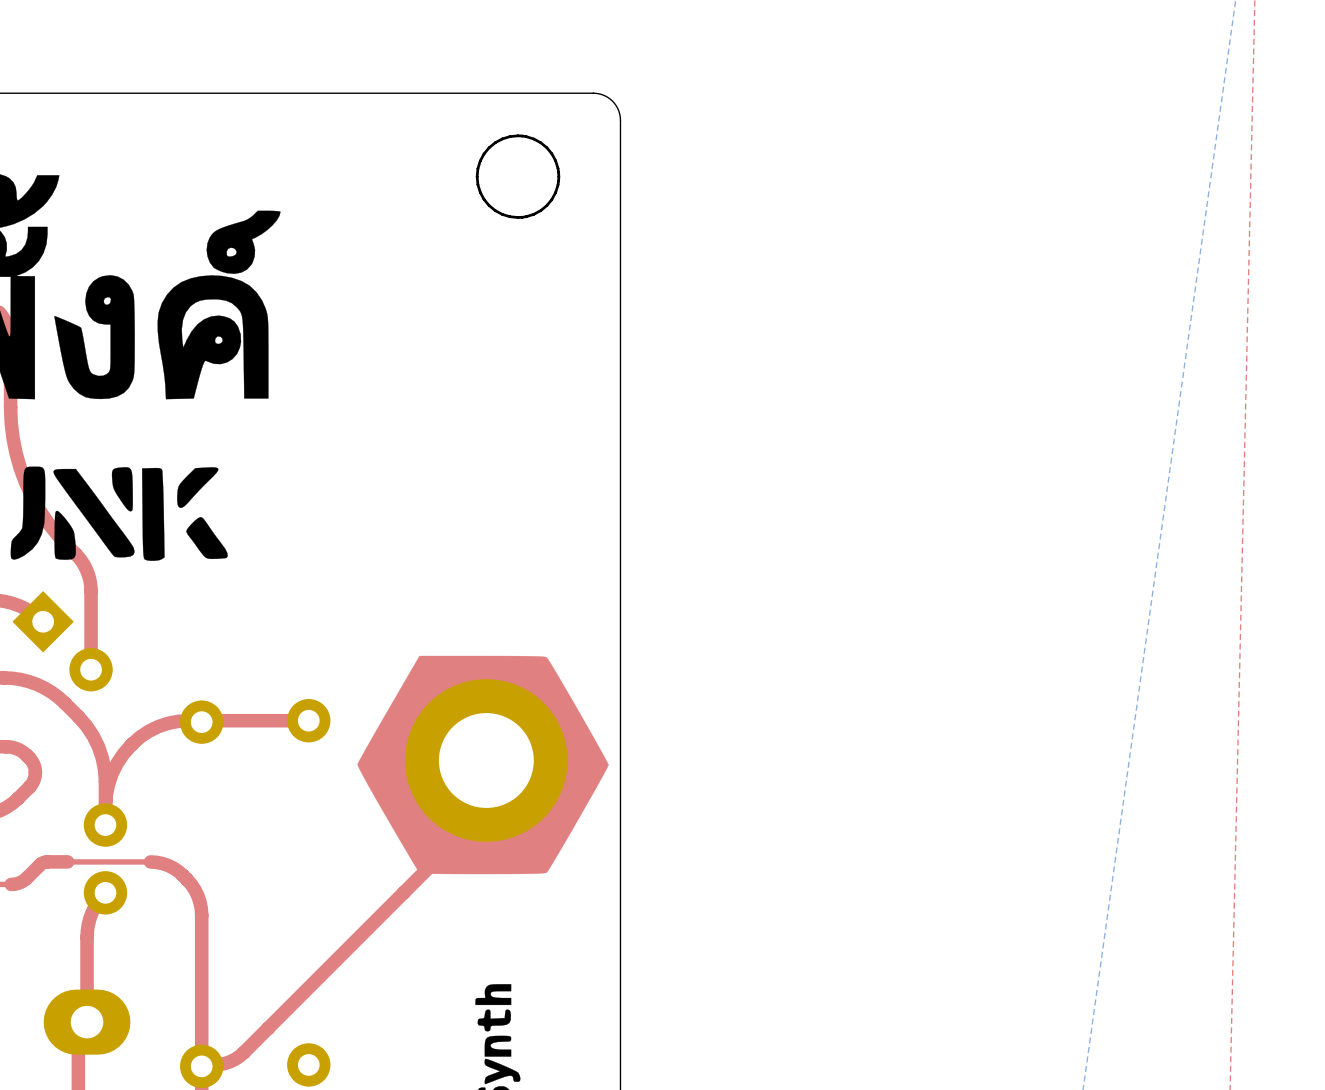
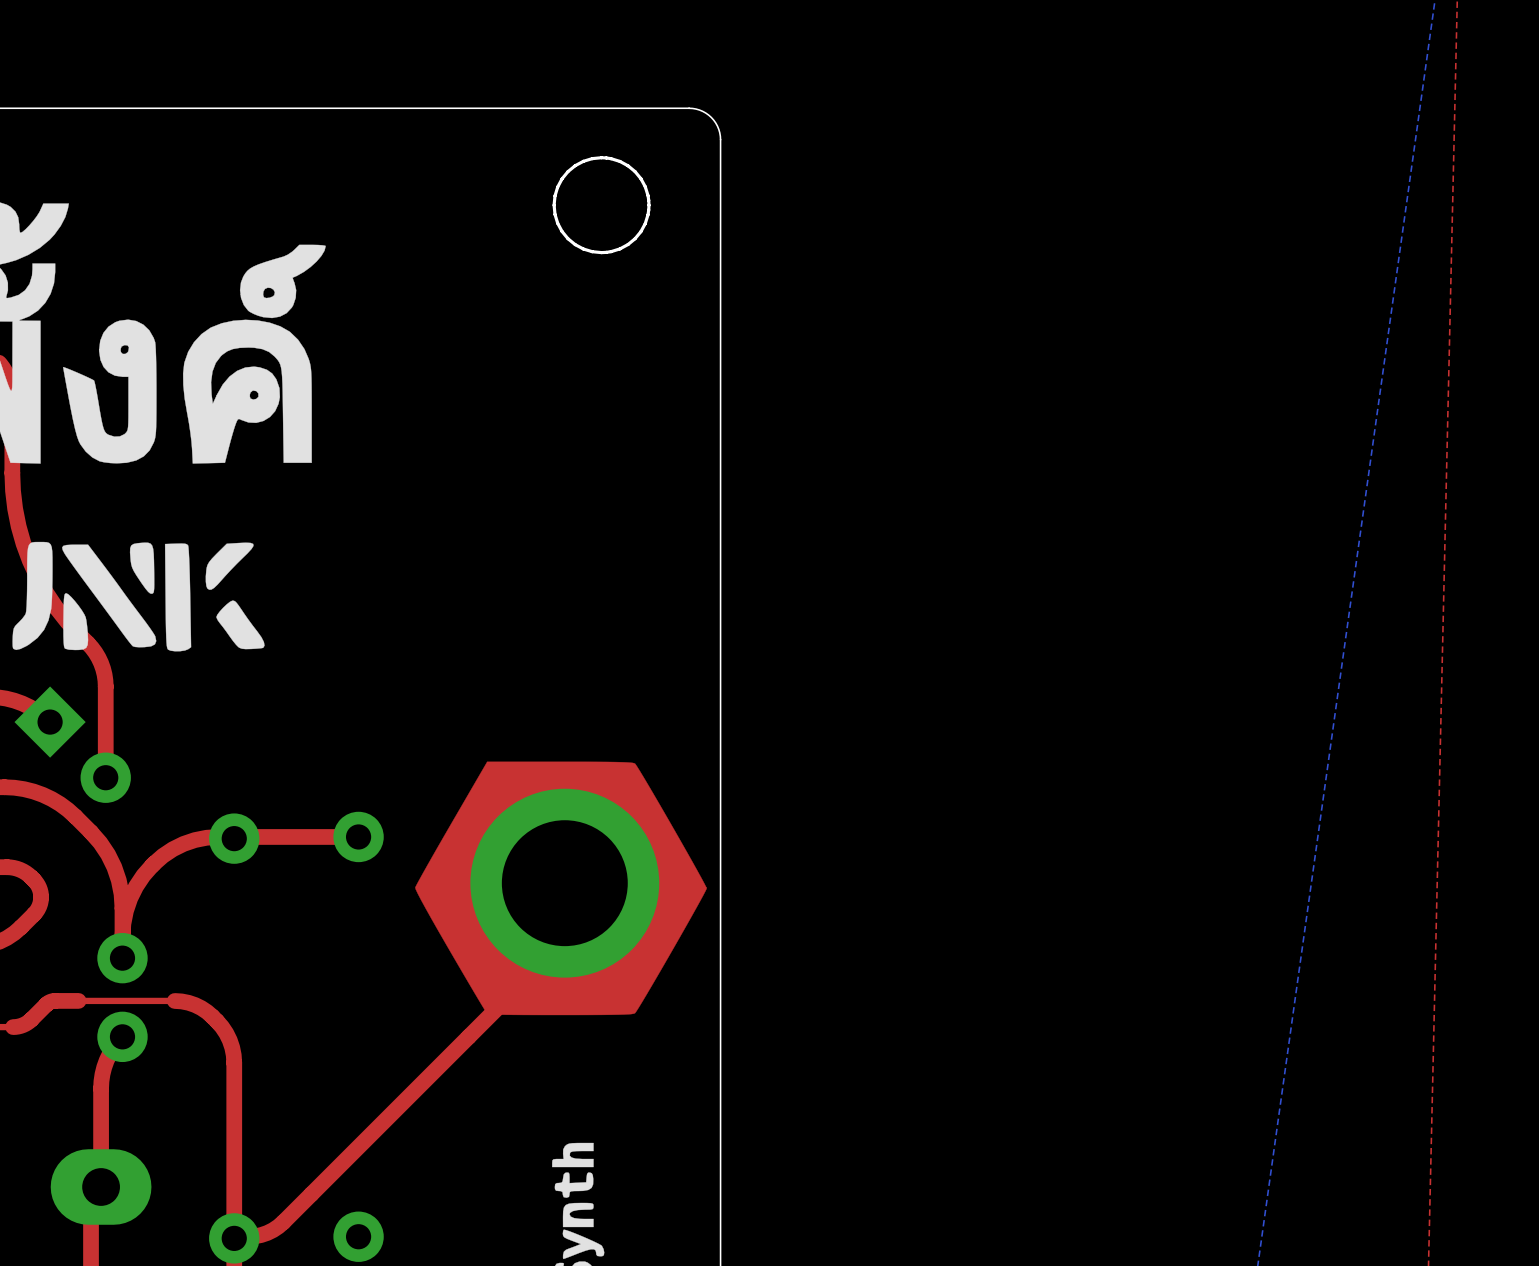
part footprint: [405, 679, 568, 842] -> [470, 788, 660, 978]

